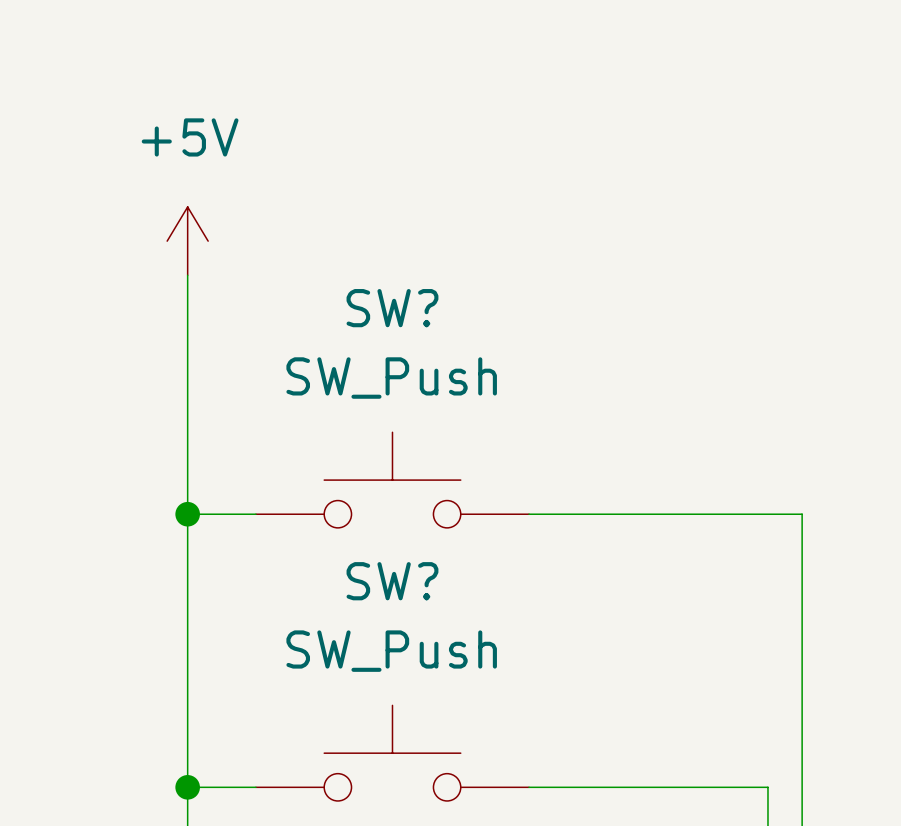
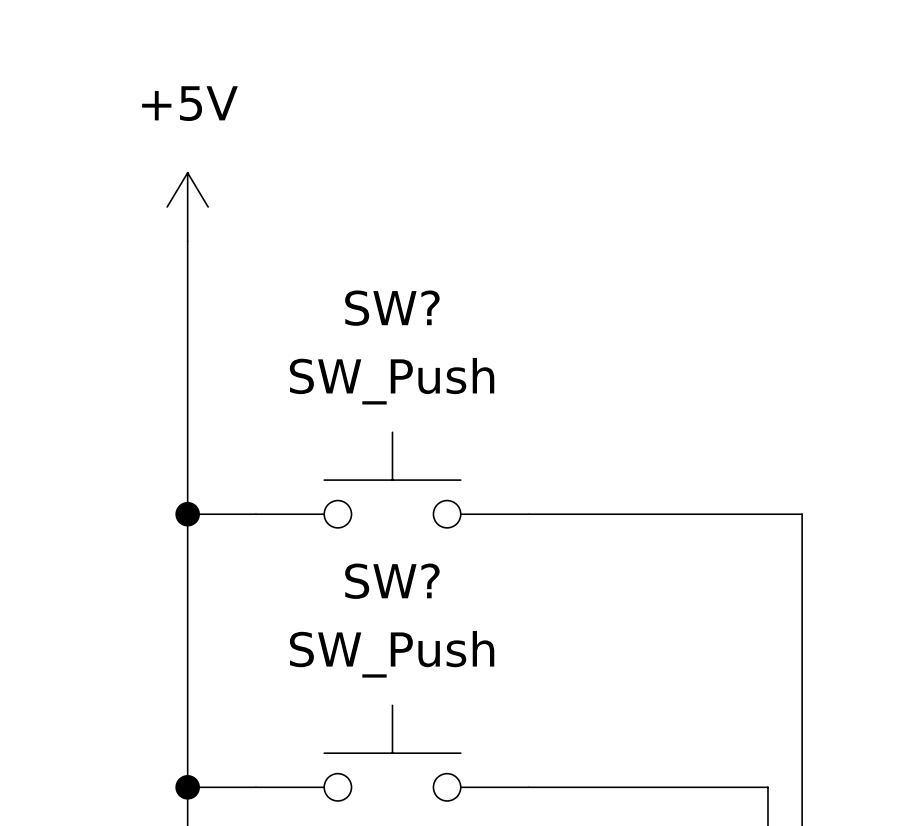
power symbol position: +5V (187, 241) -> +5V (187, 206)

